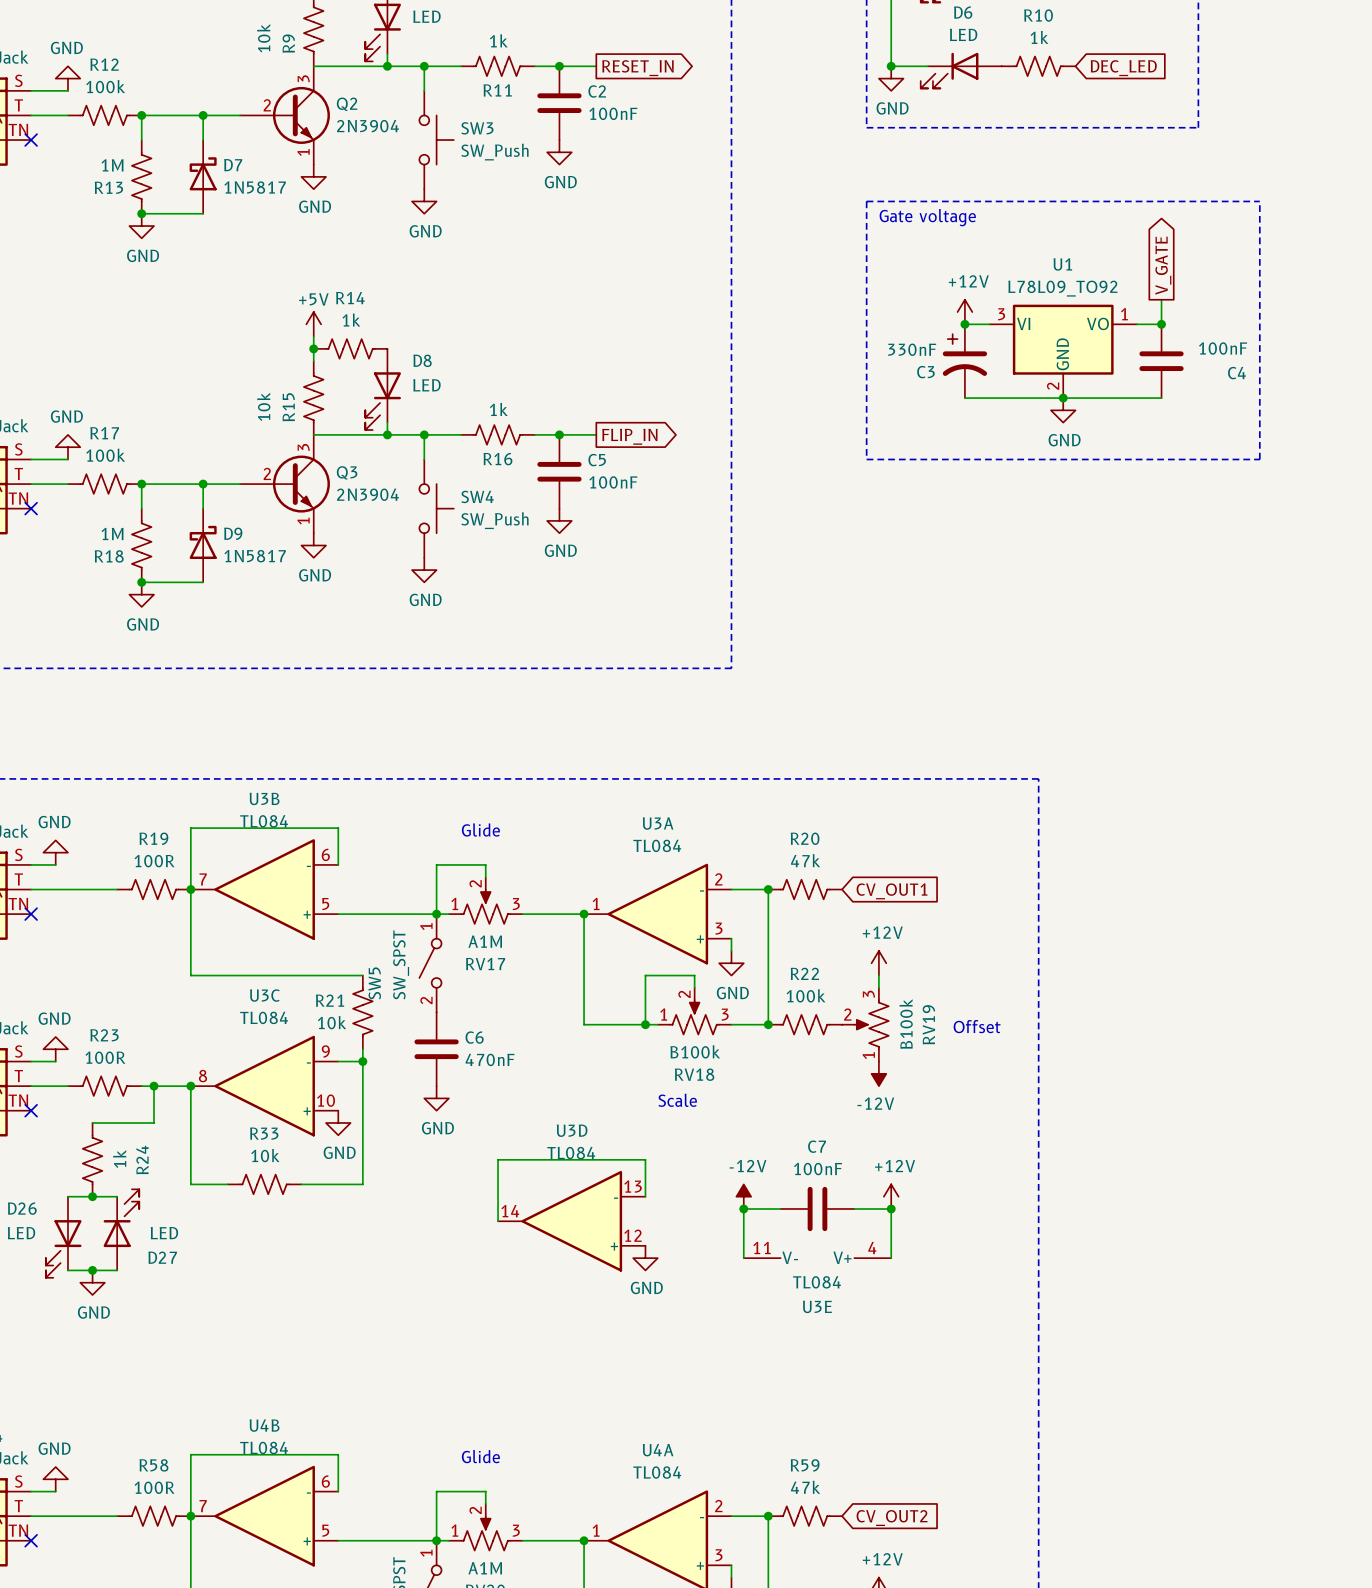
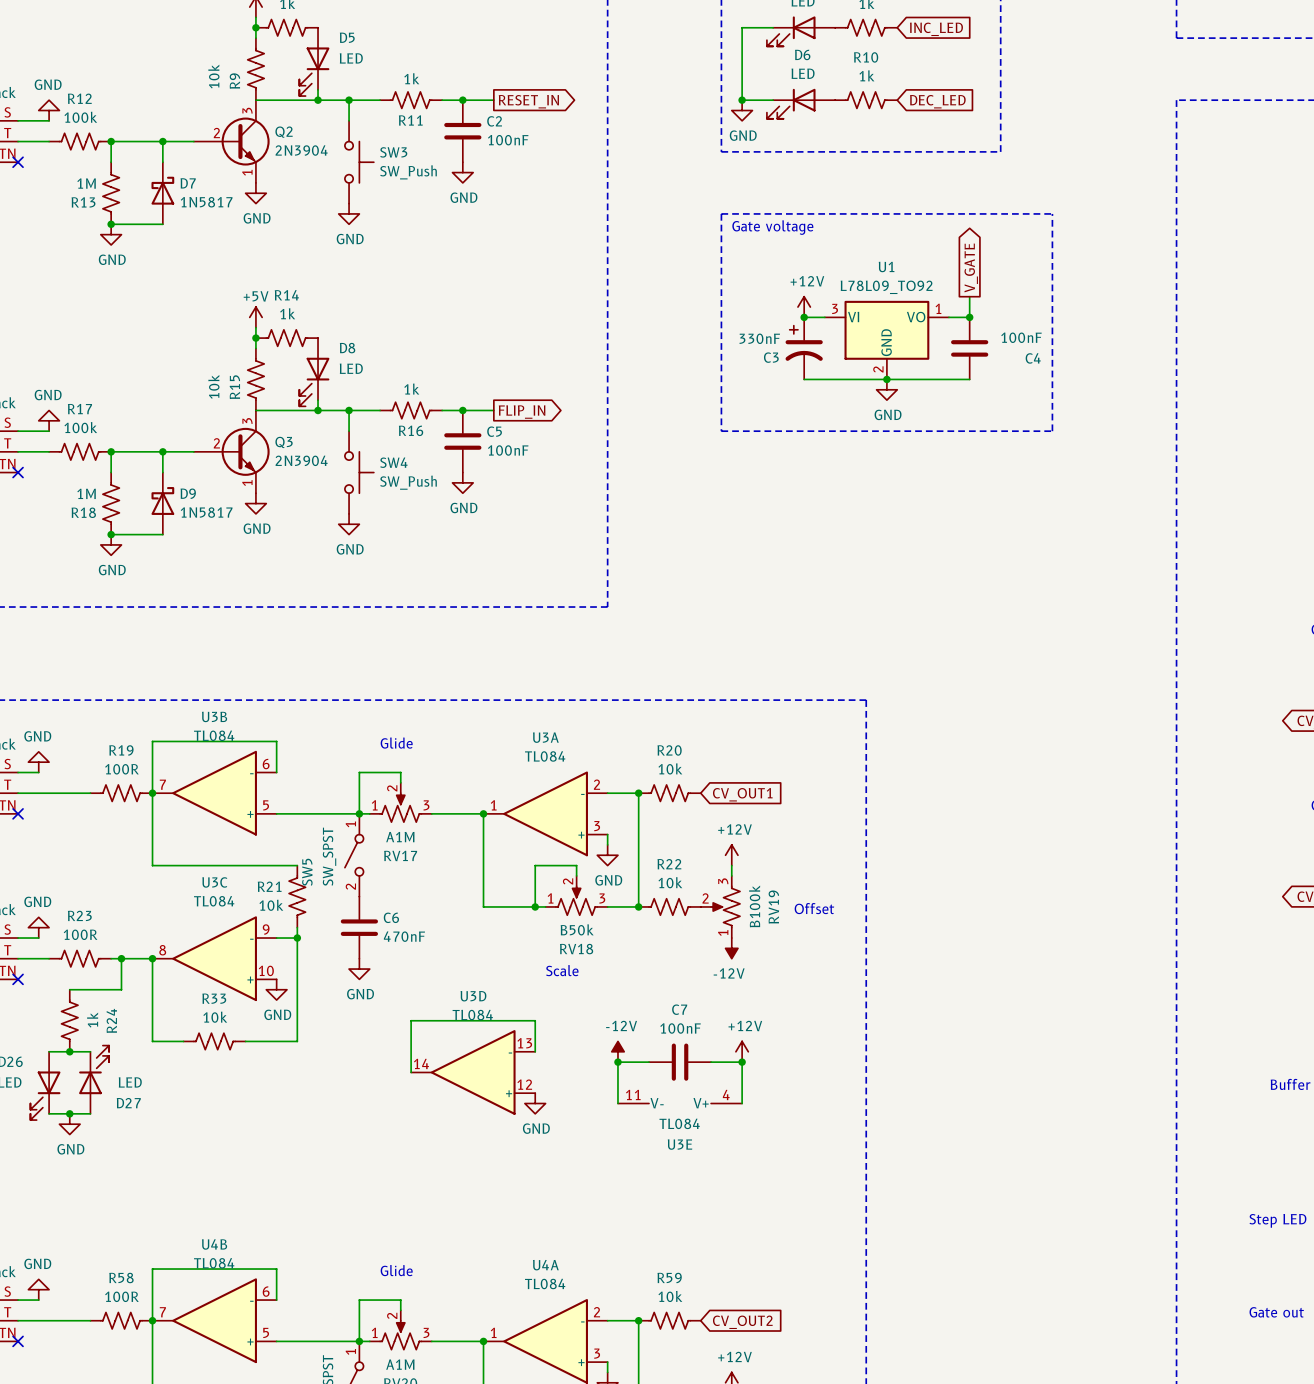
R20 value: 47k (805, 860) -> 10k (670, 768)
R22 value: 100k (806, 995) -> 10k (670, 882)
RV18 value: B100k (695, 1051) -> B50k (577, 929)
R59 value: 47k (805, 1487) -> 10k (670, 1296)

